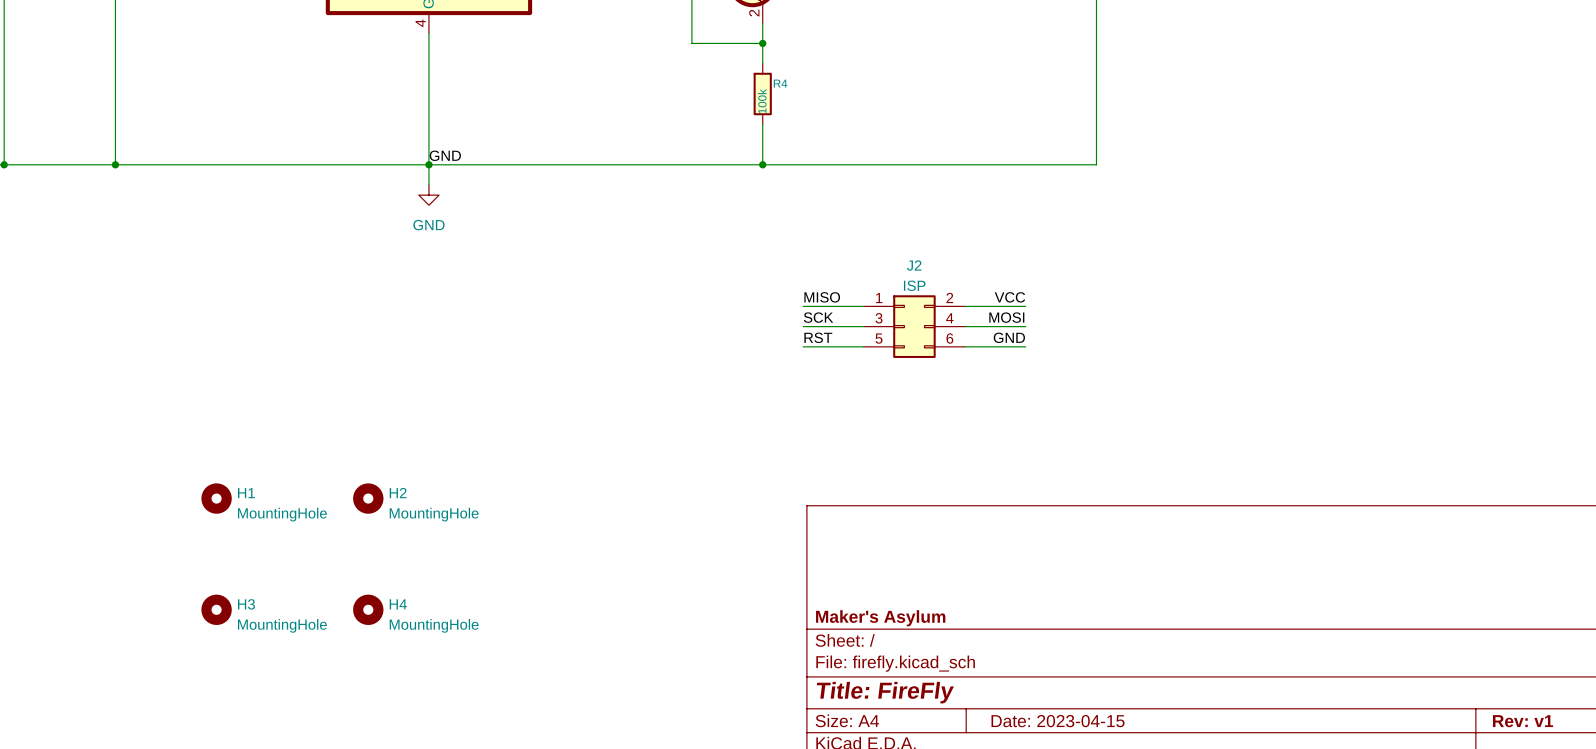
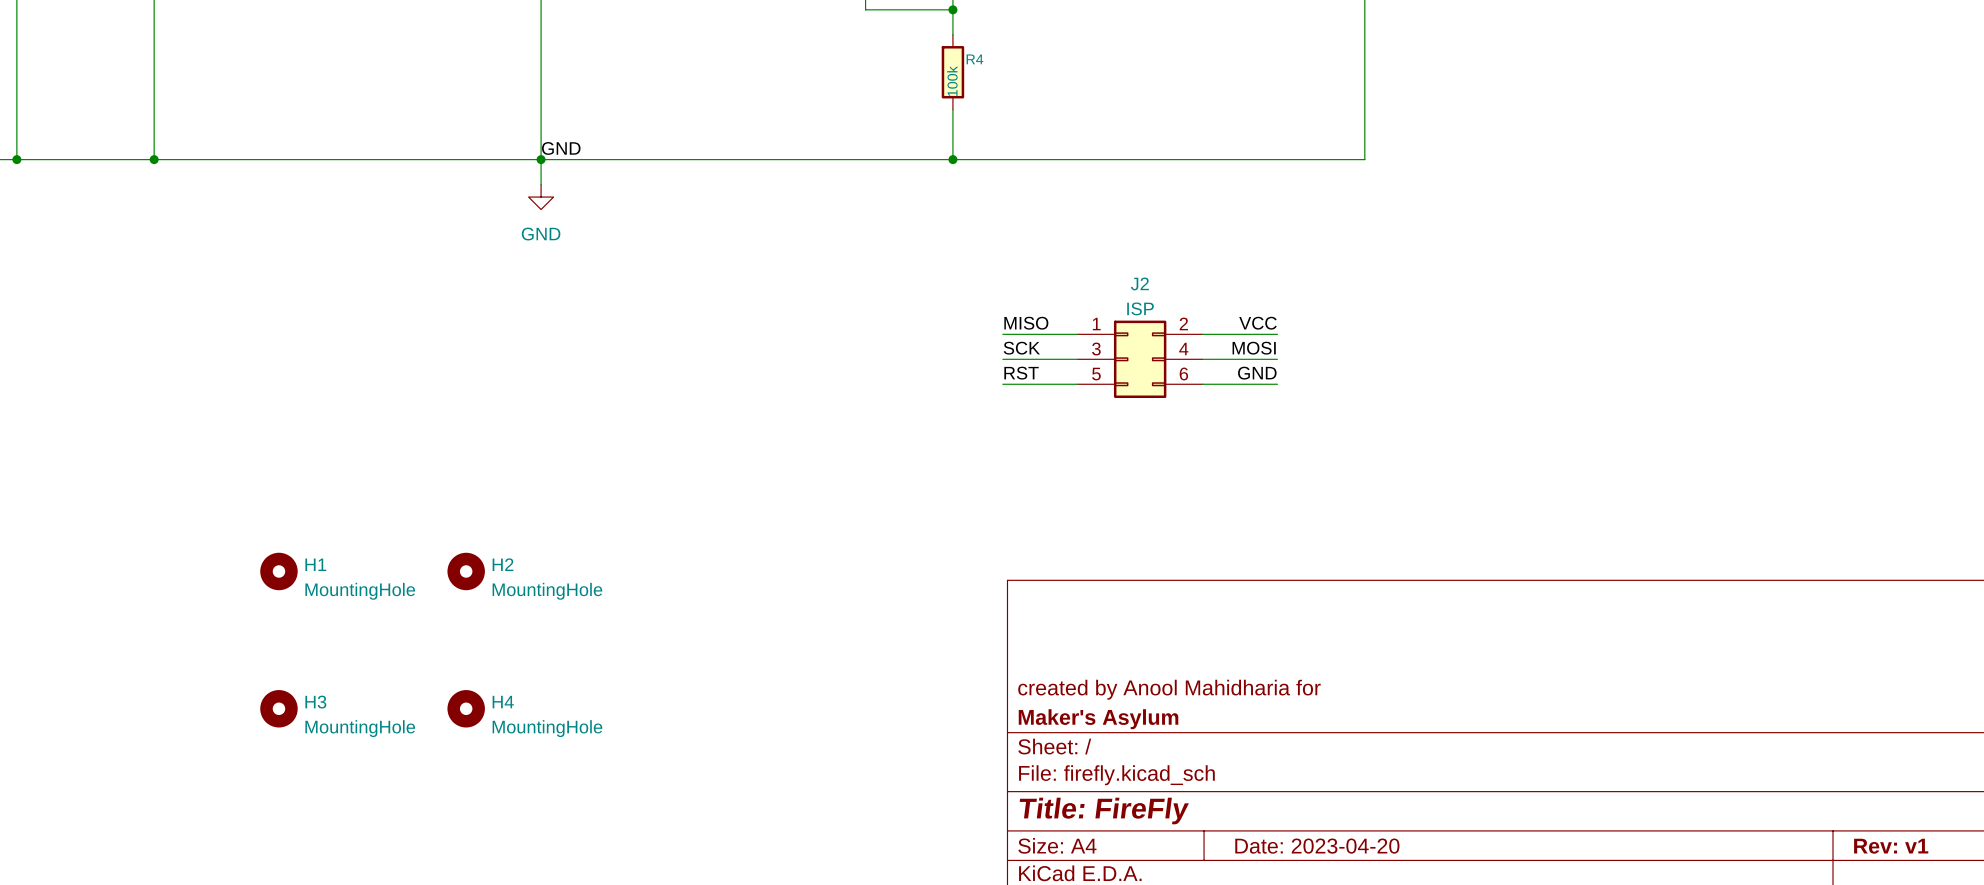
title block: none -> created by Anool Mahidharia for (1169, 689)
title block: Date: 2023-04-15 (1058, 721) -> Date: 2023-04-20 (1317, 846)

